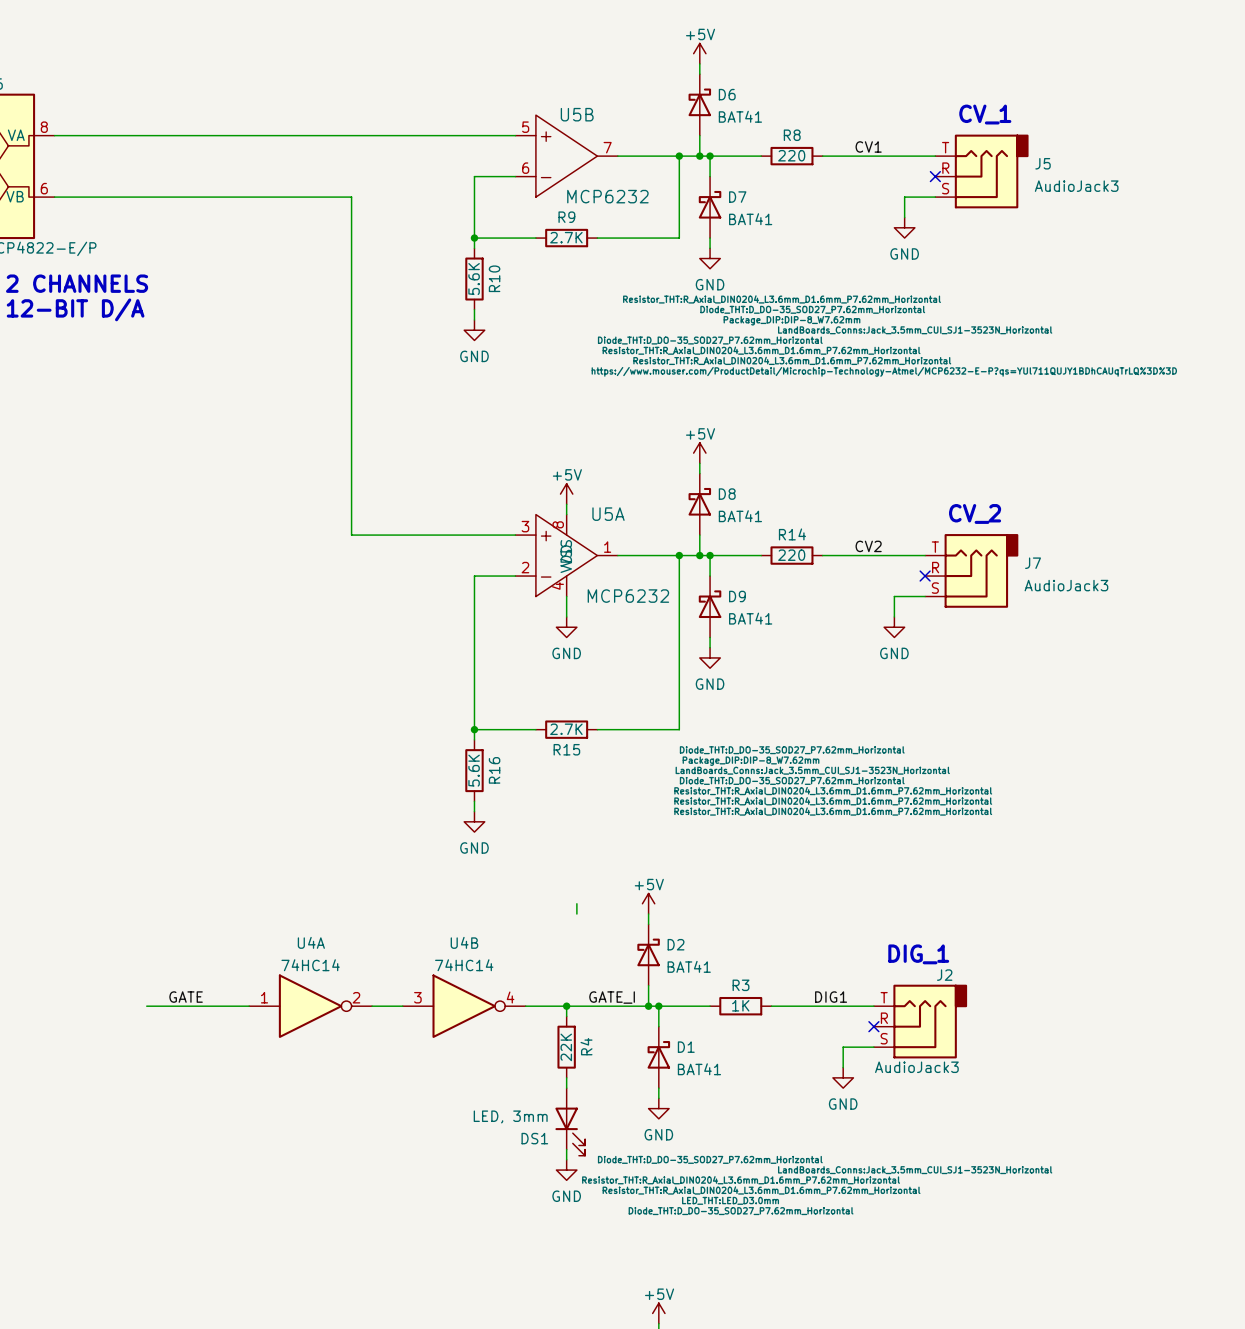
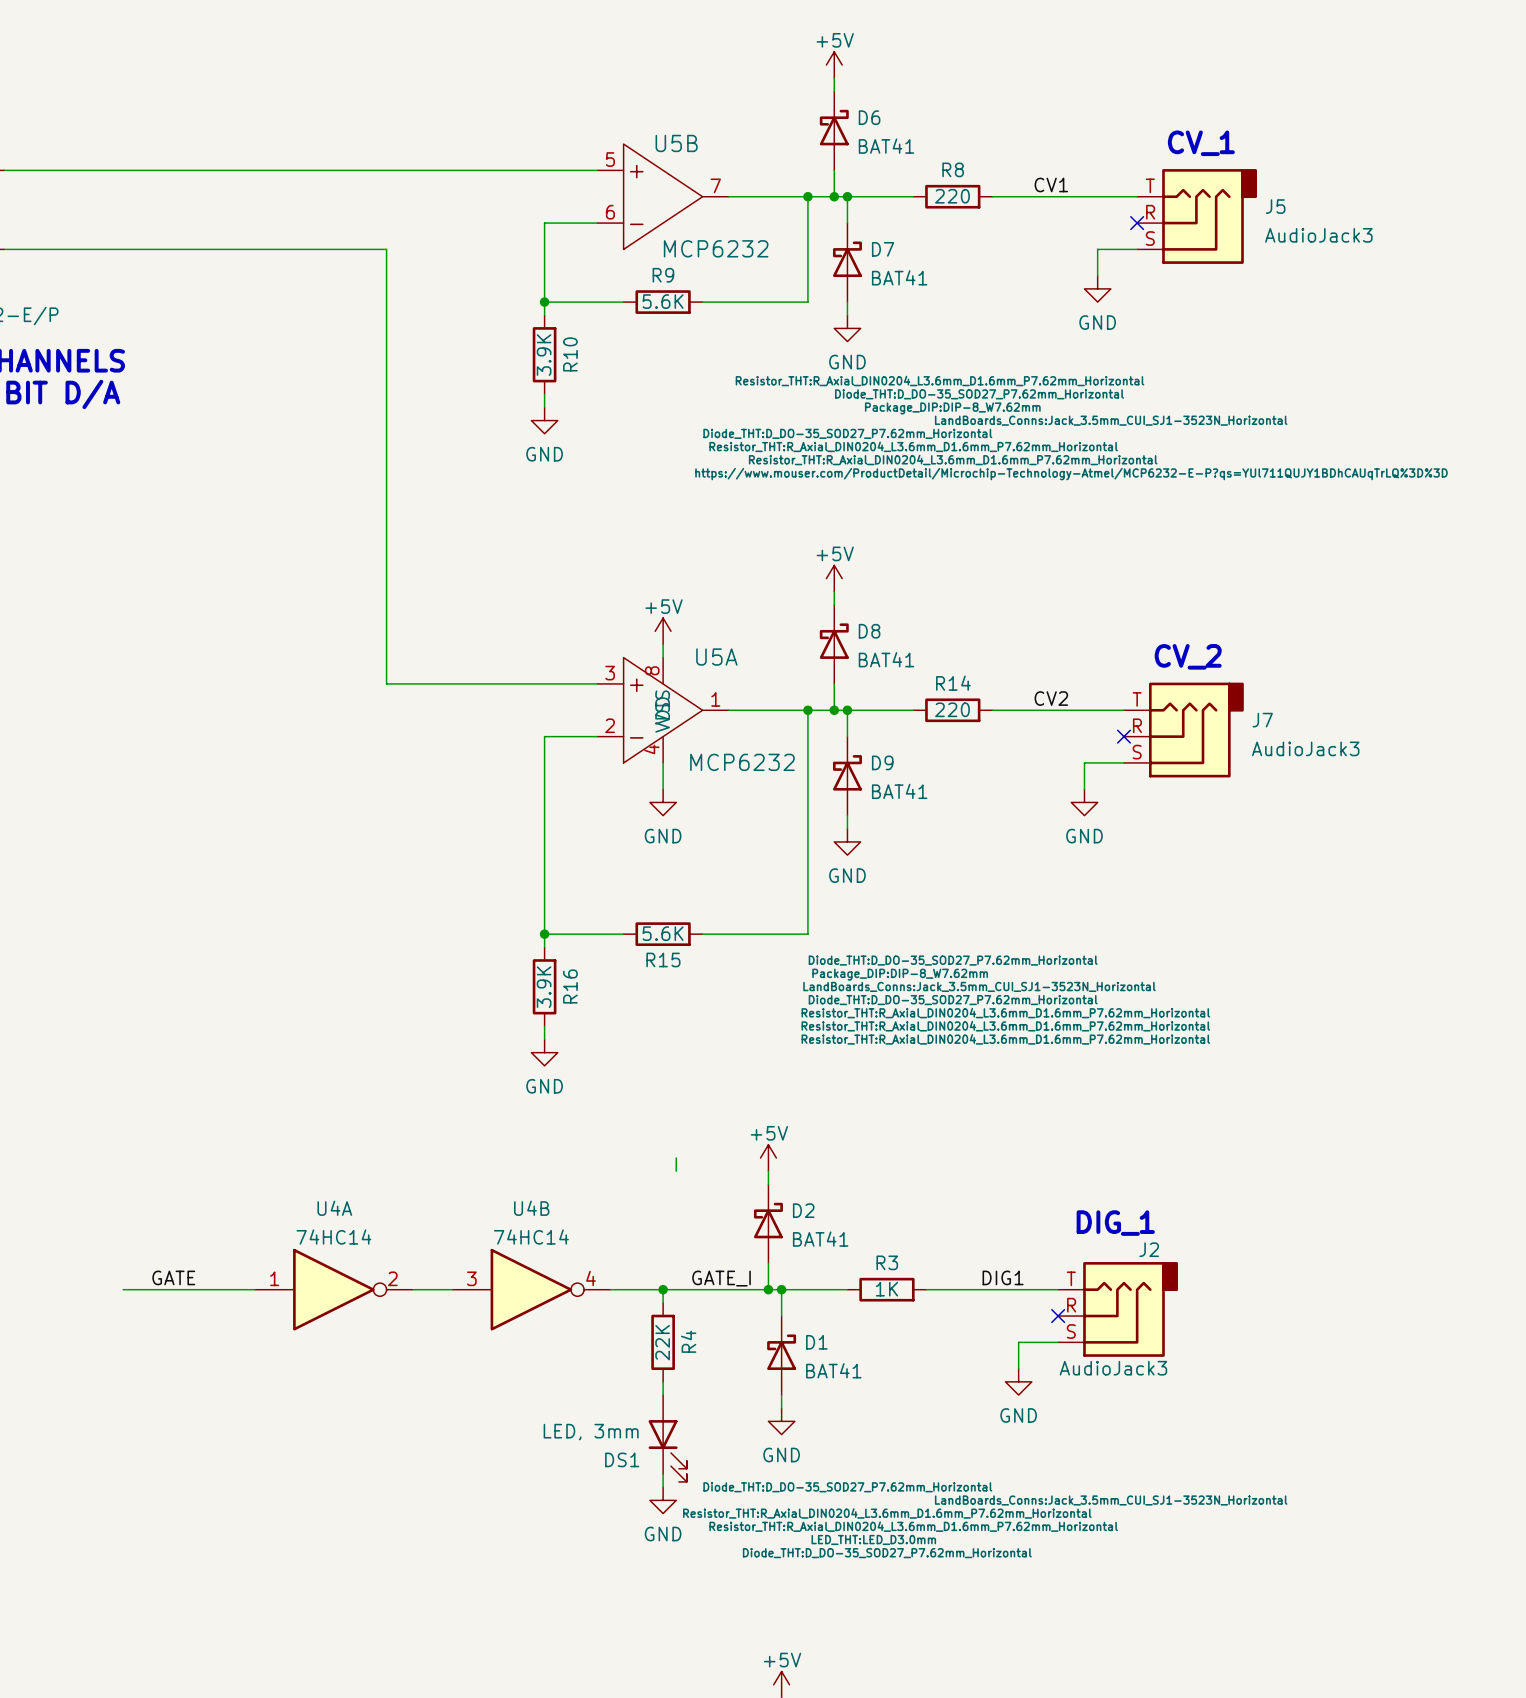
R9 value: 2.7K (566, 237) -> 5.6K (663, 301)
R10 value: 5.6K (474, 279) -> 3.9K (544, 355)
R15 value: 2.7K (566, 729) -> 5.6K (663, 933)
R16 value: 5.6K (474, 770) -> 3.9K (544, 987)

